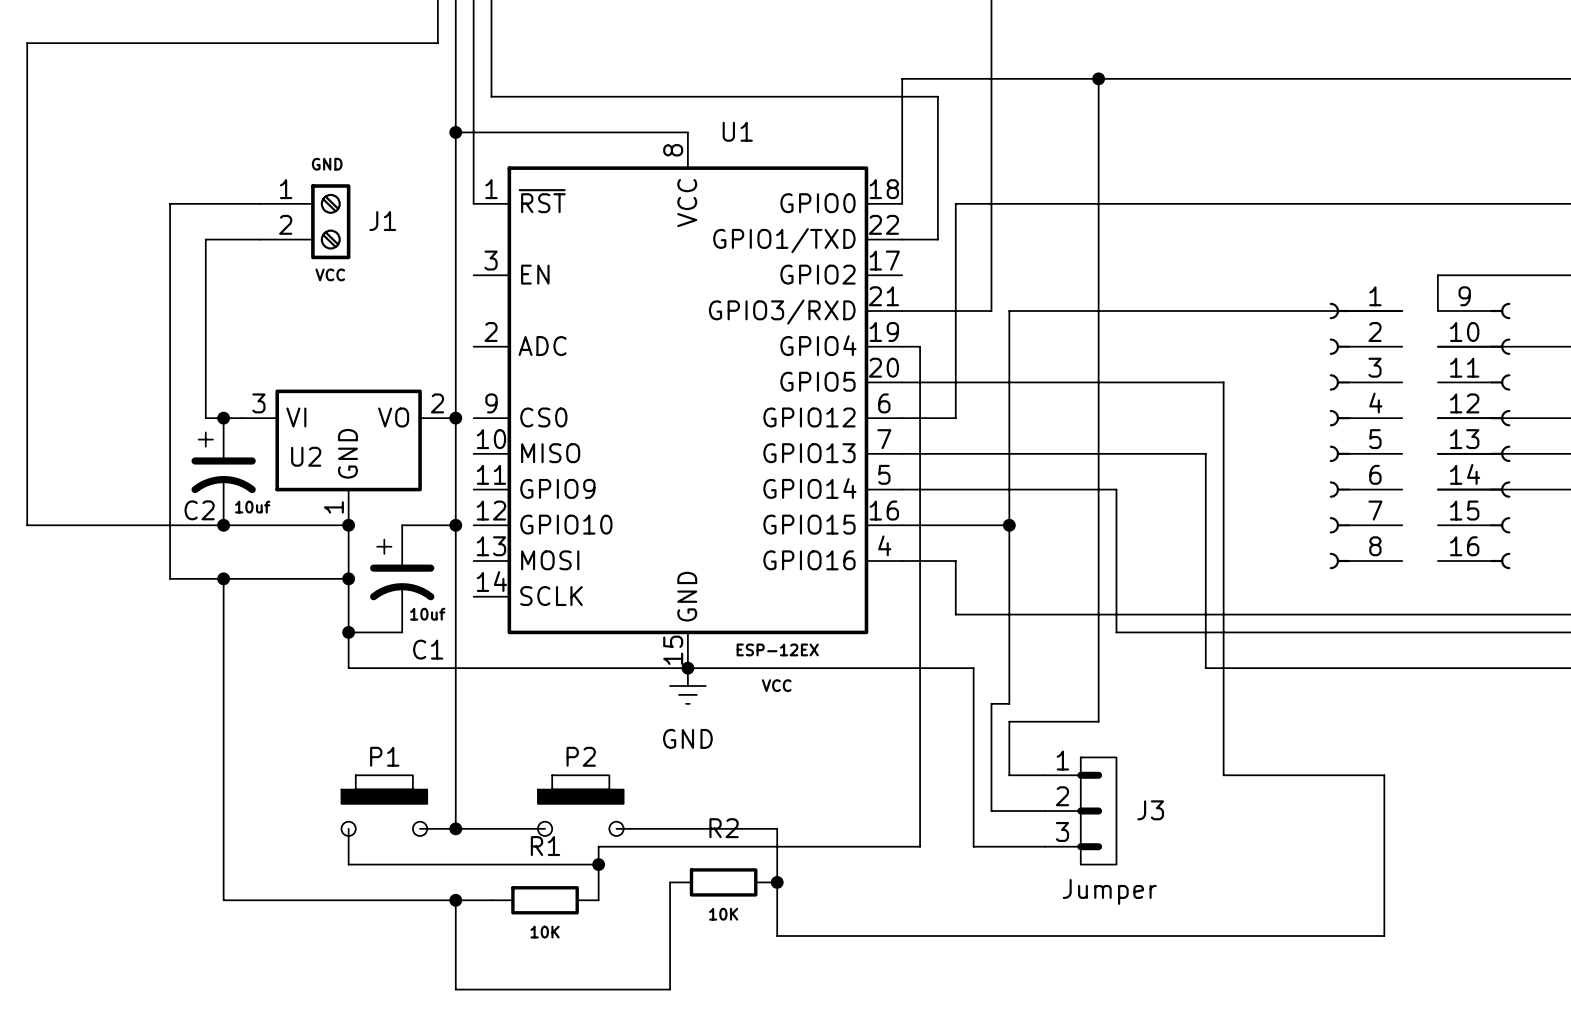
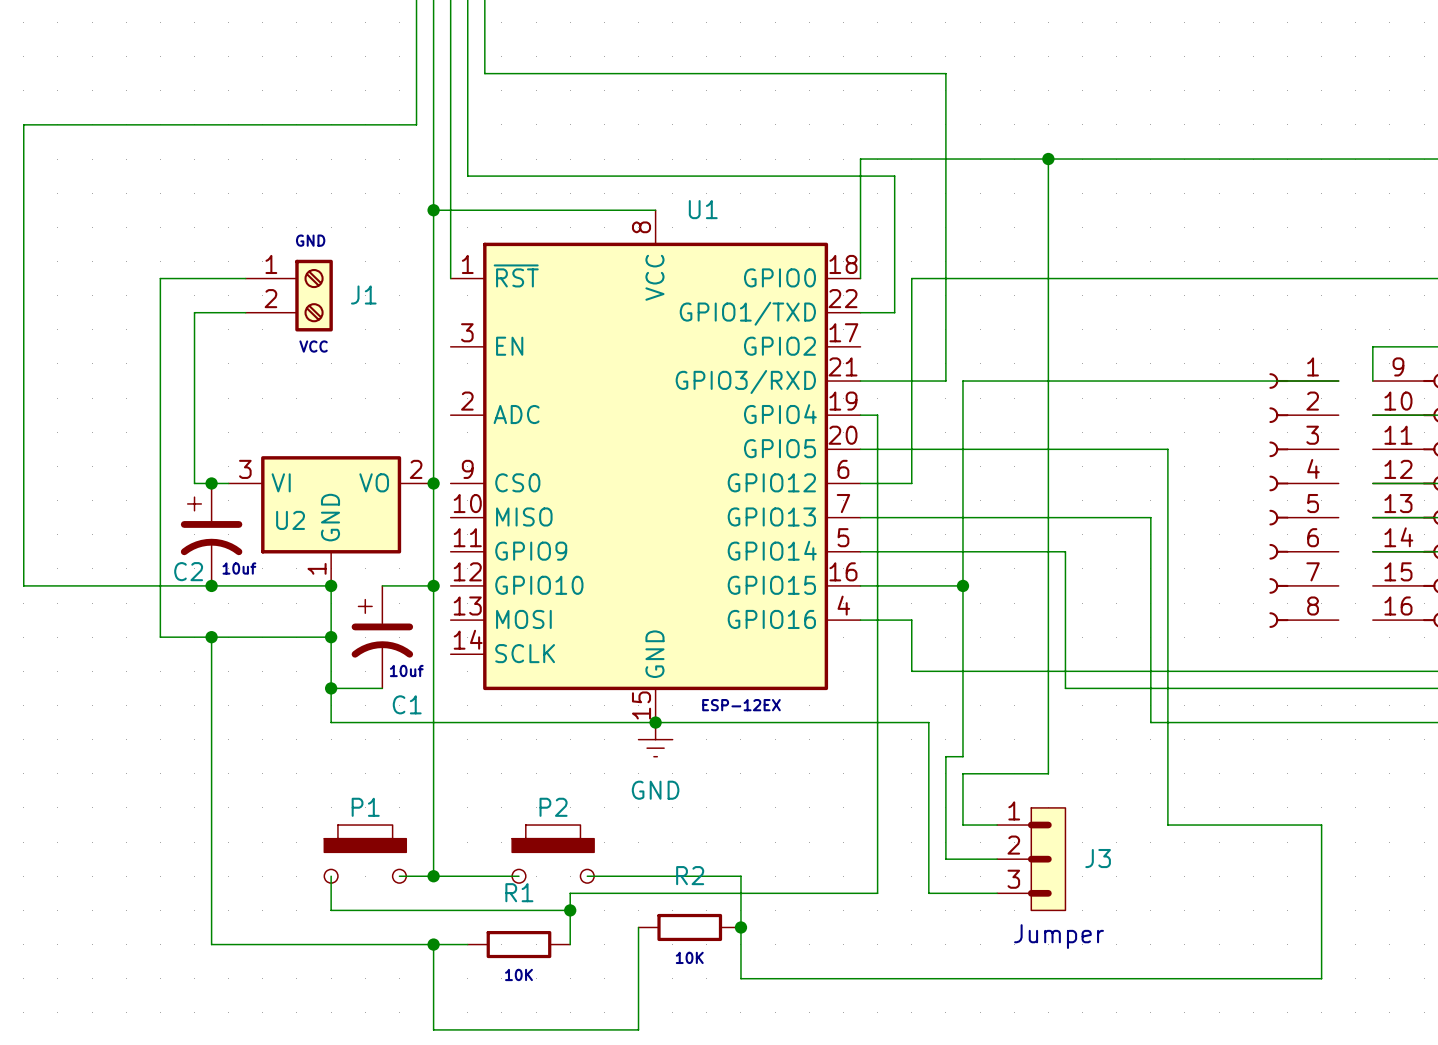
text: VCC (776, 685) -> none

